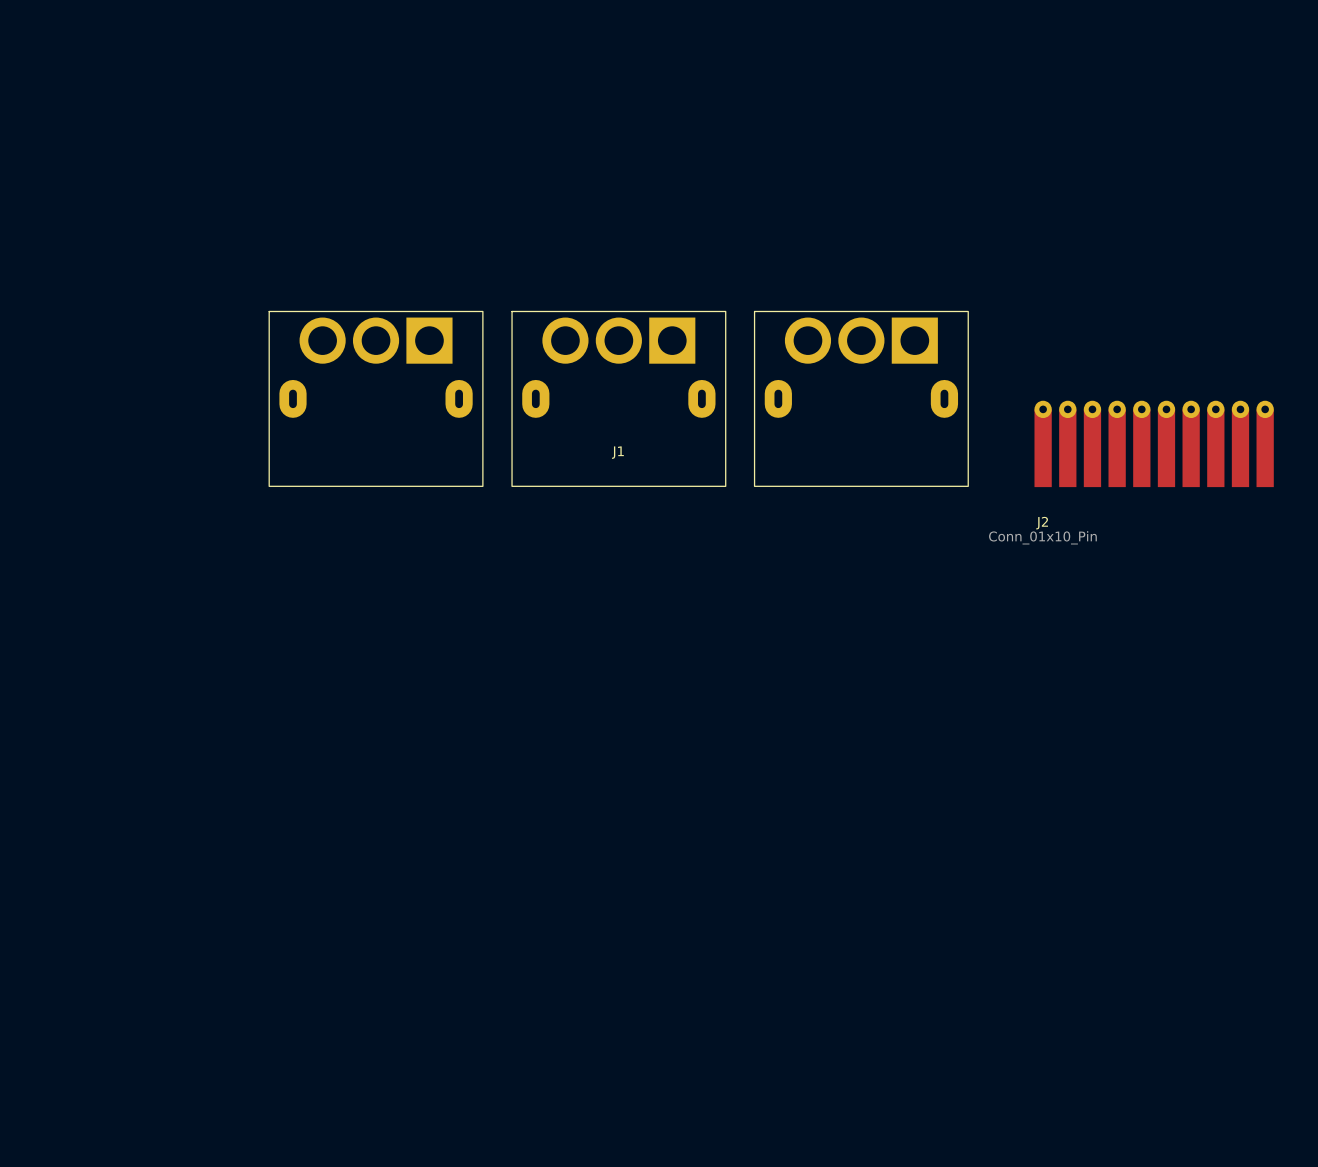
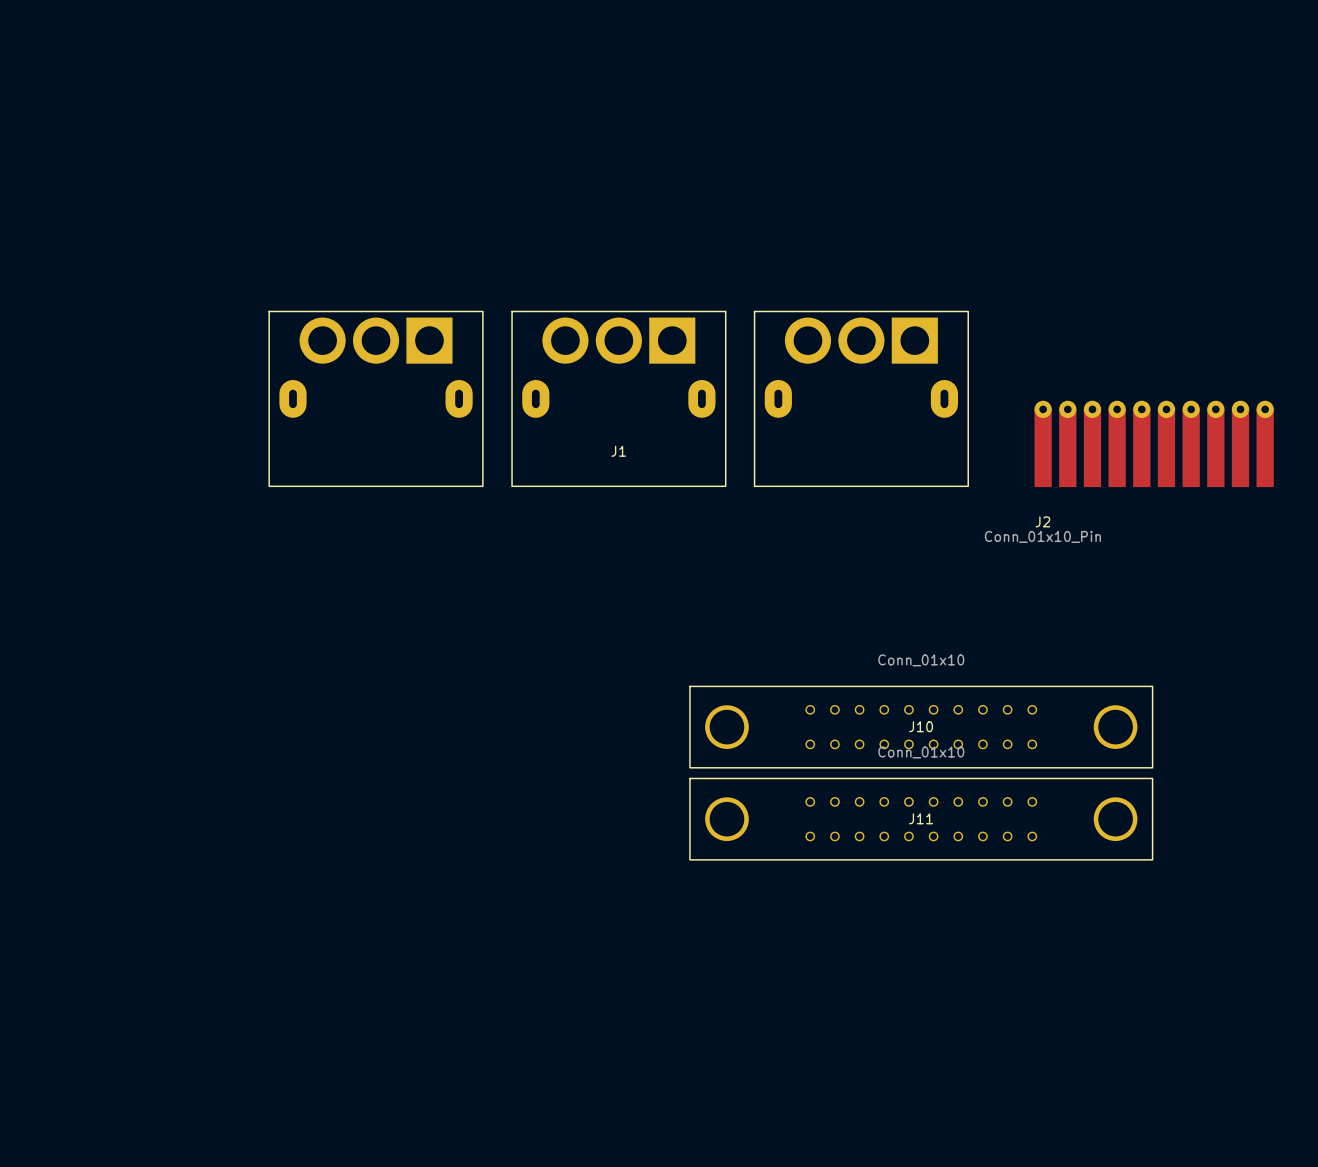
J10: none -> Conn_01x10 (921, 727)
J11: none -> Conn_01x10 (921, 819)

